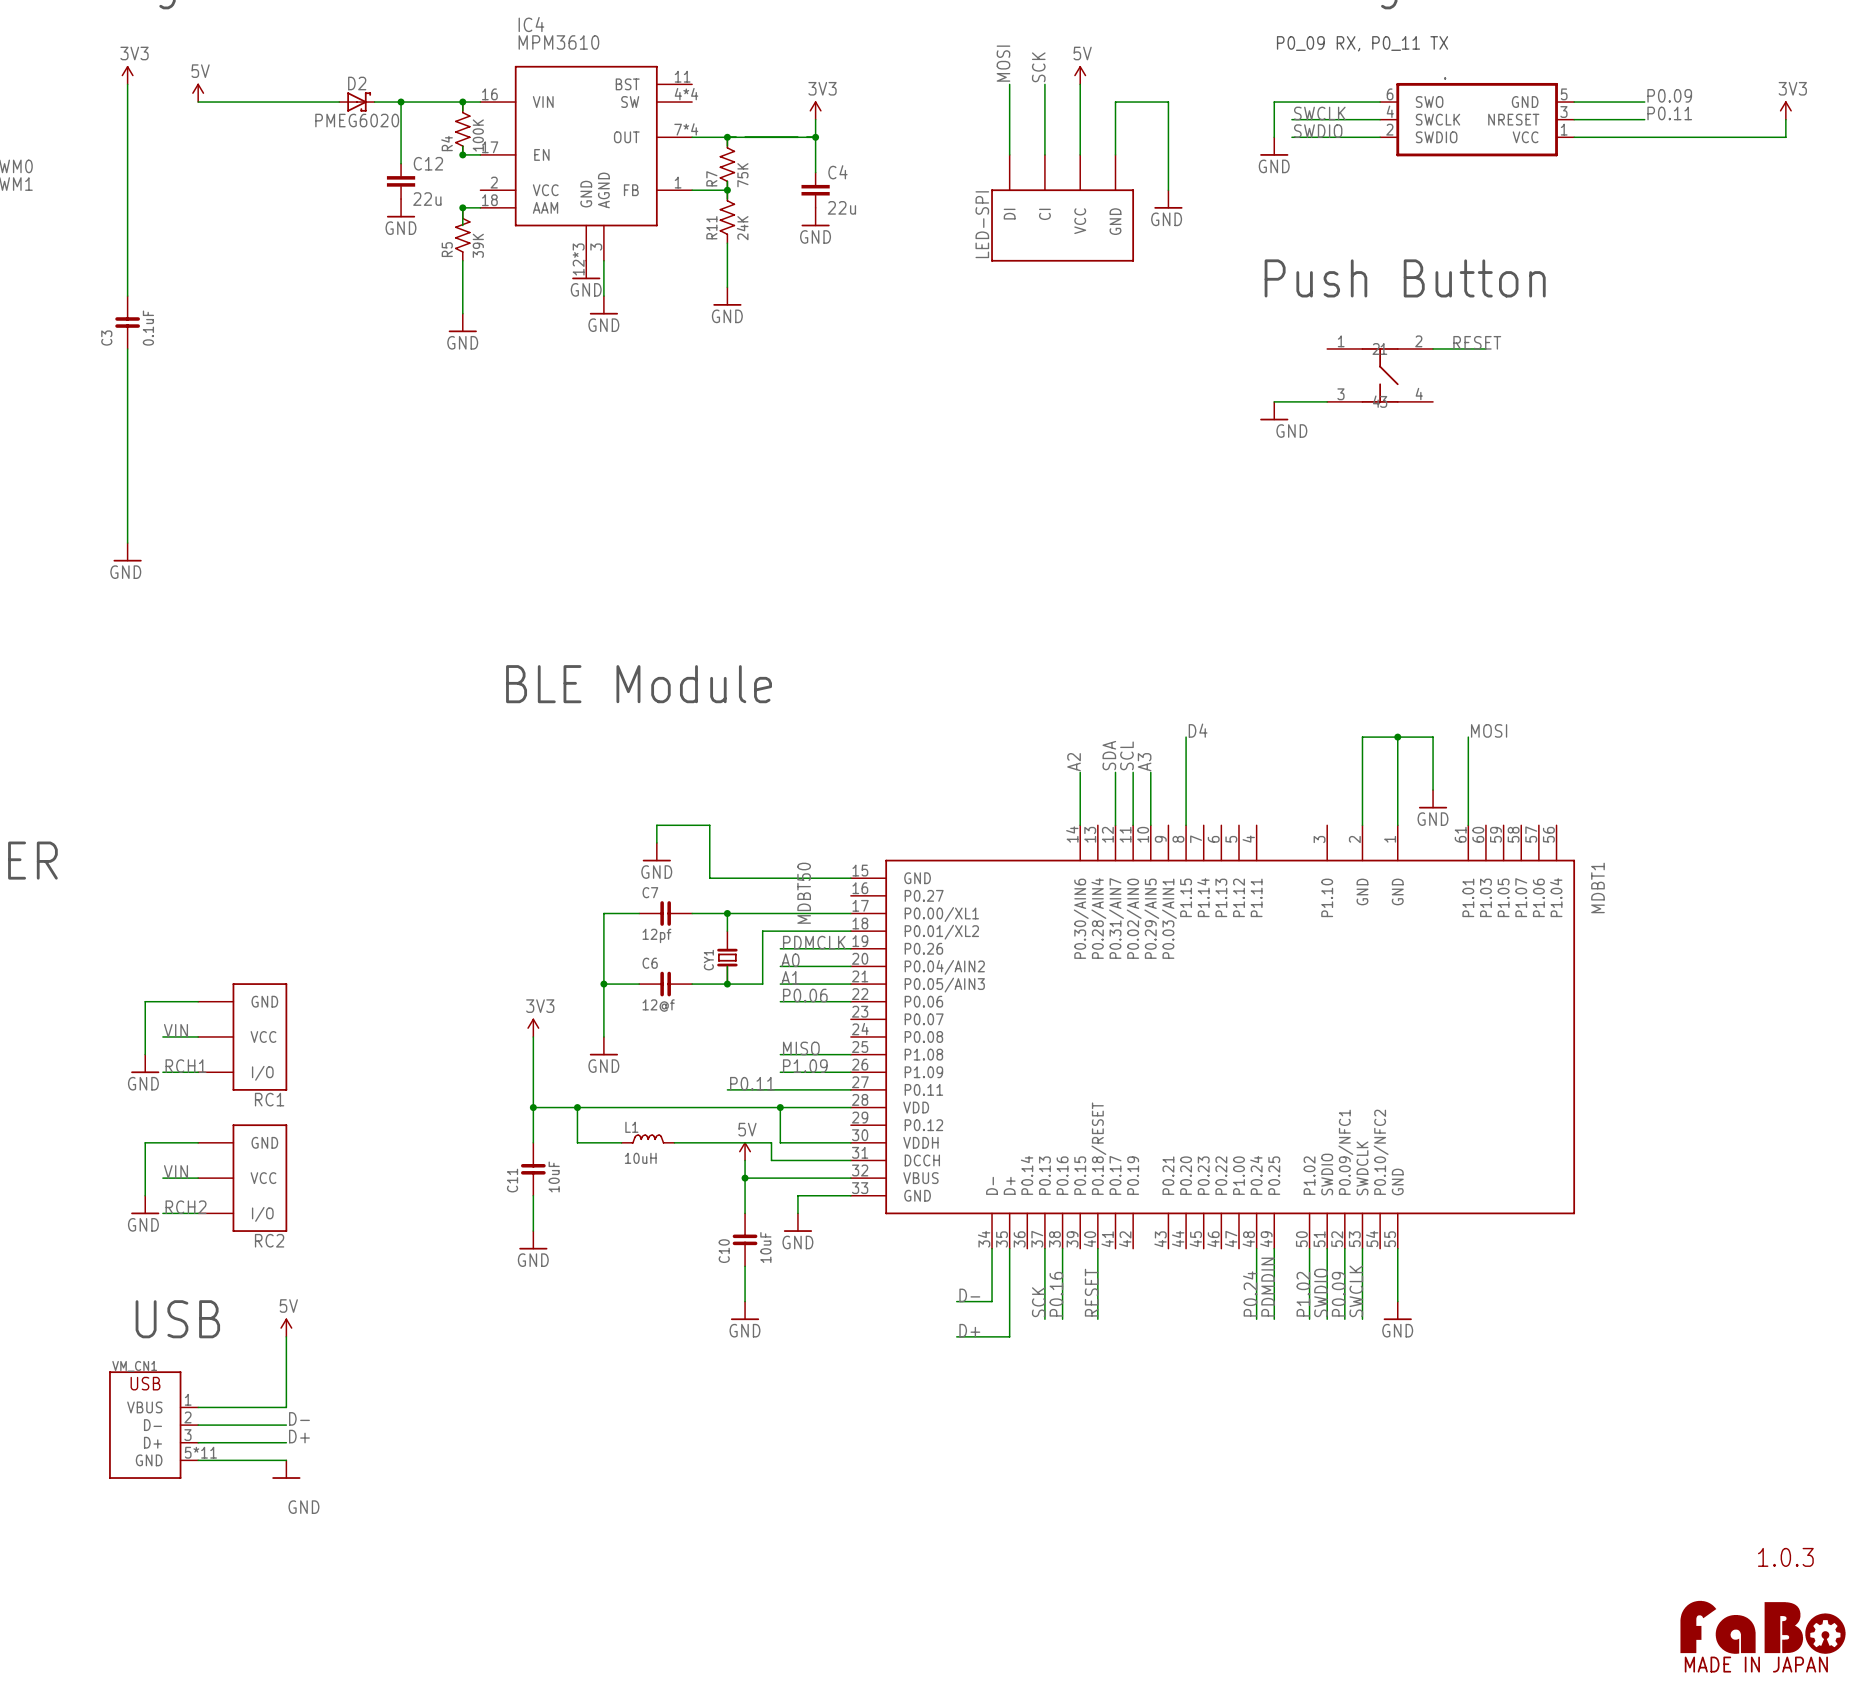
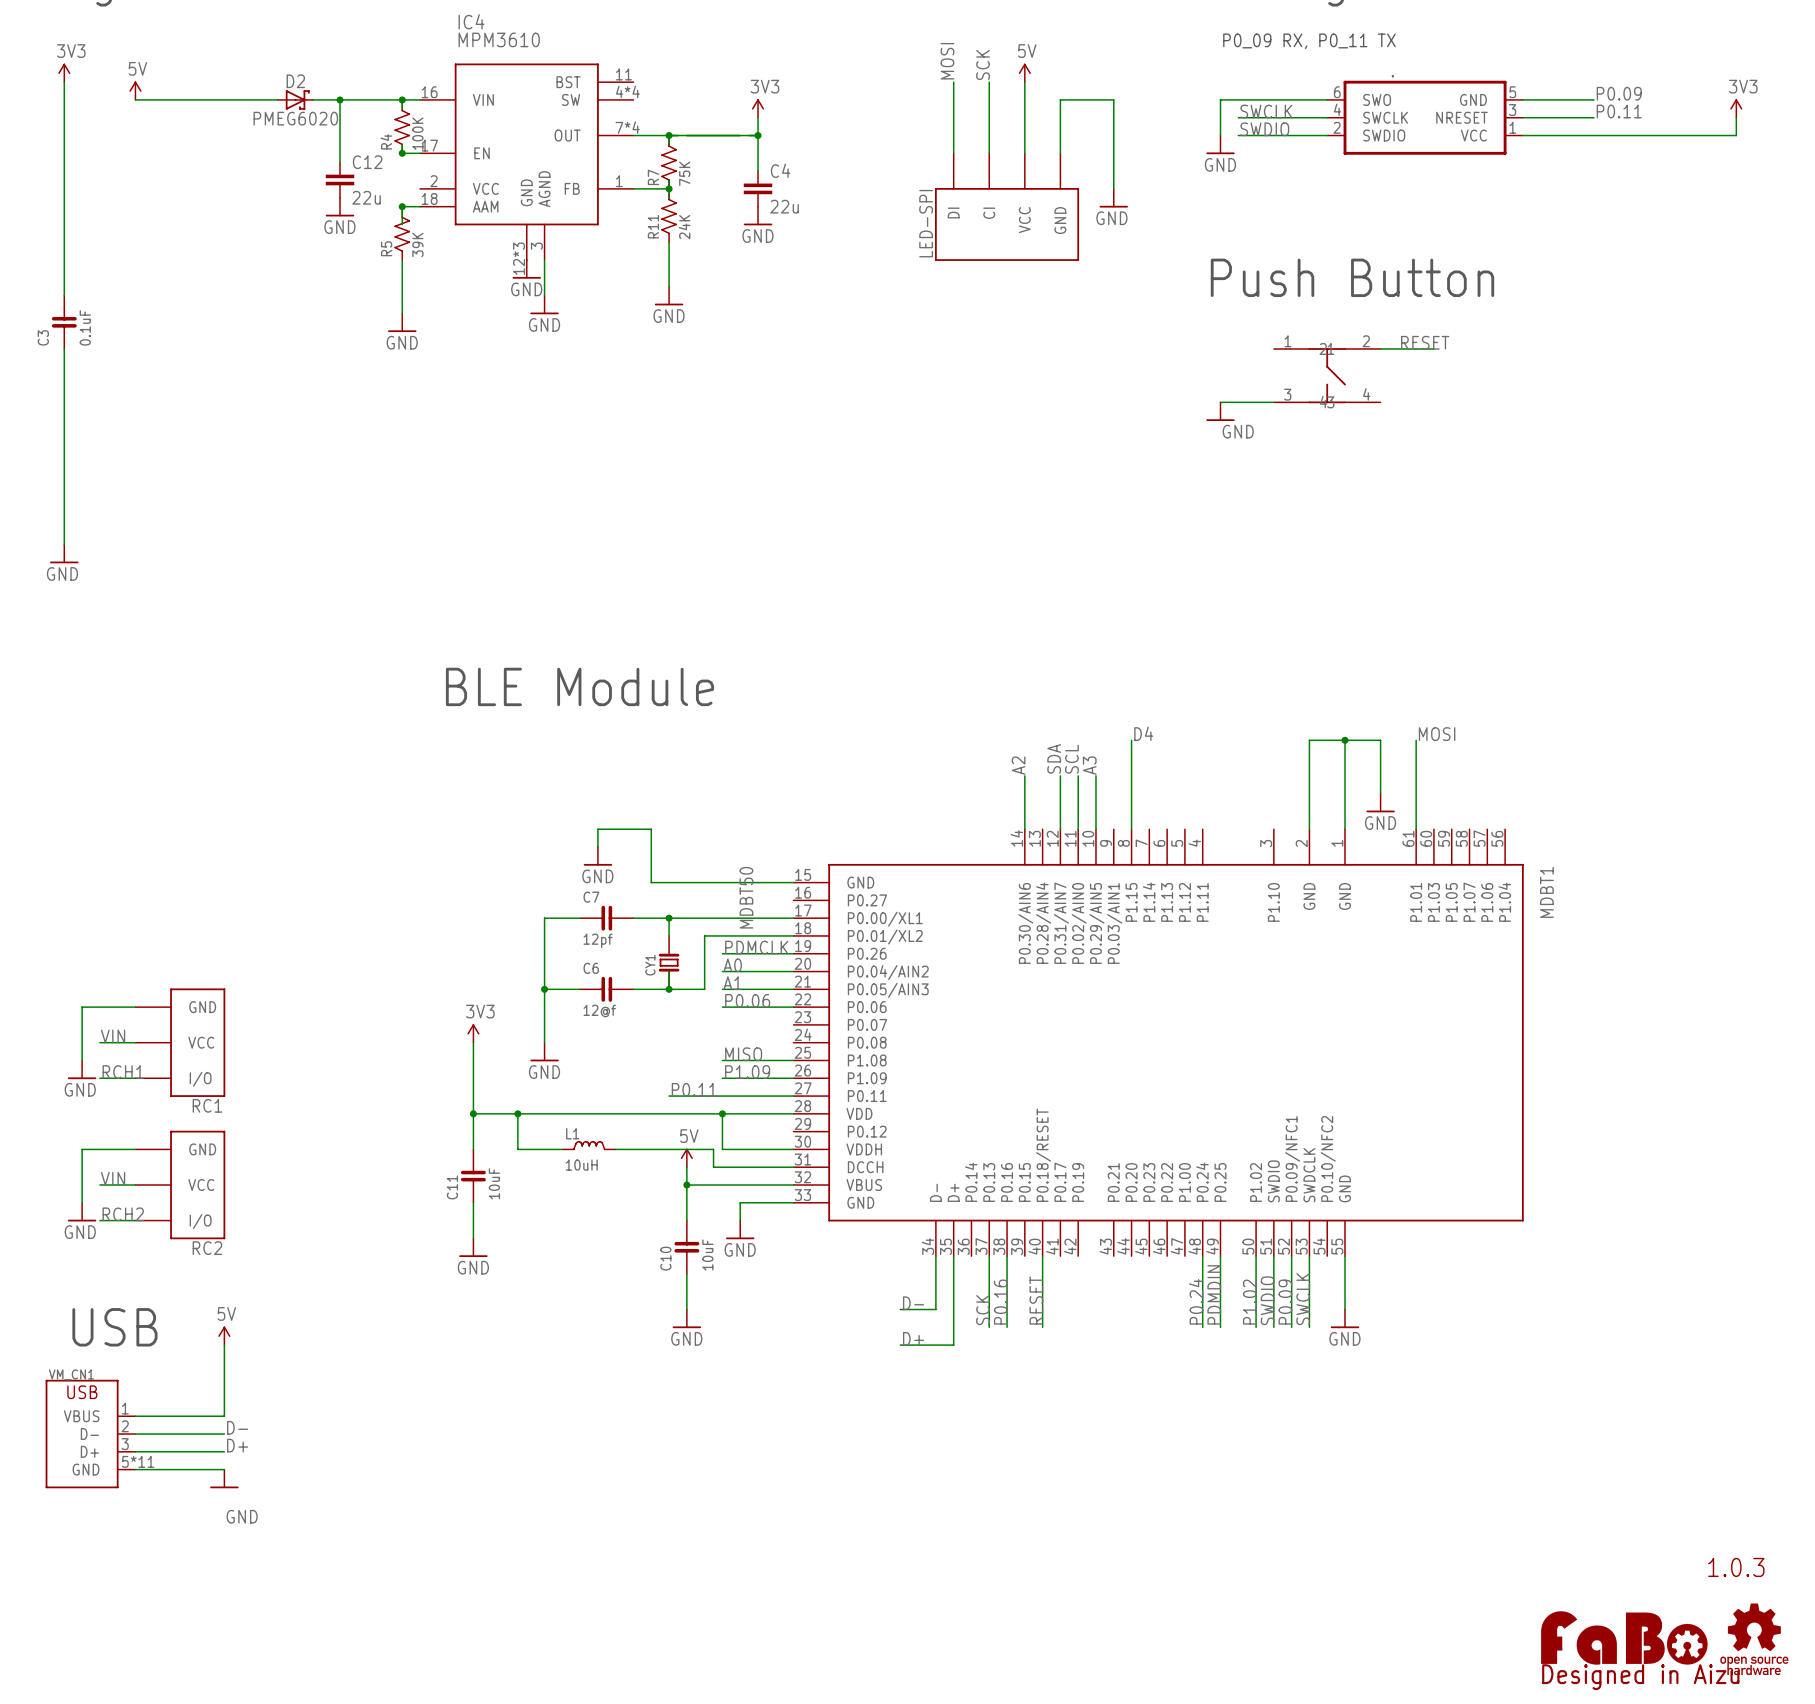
part: none -> (1624, 1637)
part: (1763, 1627) -> none
part: none -> (1754, 1639)

